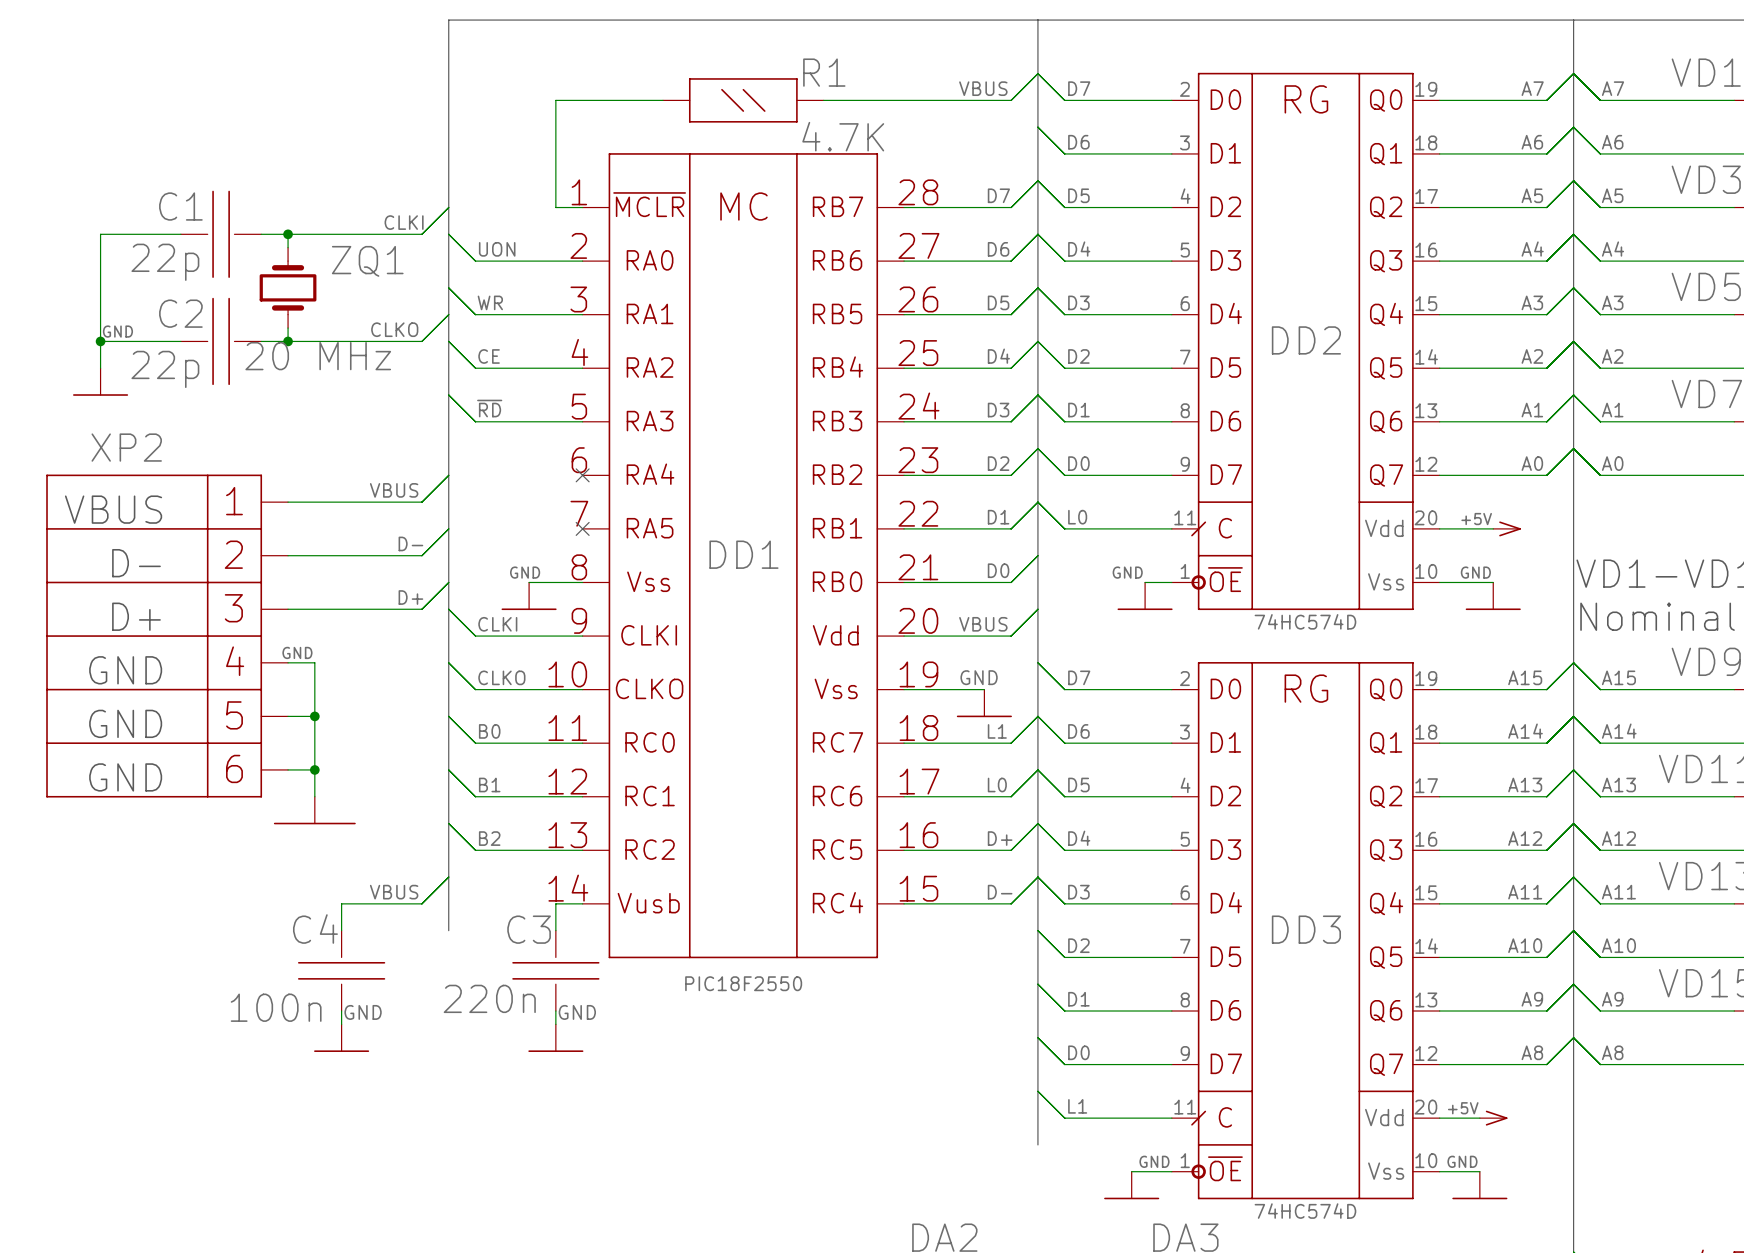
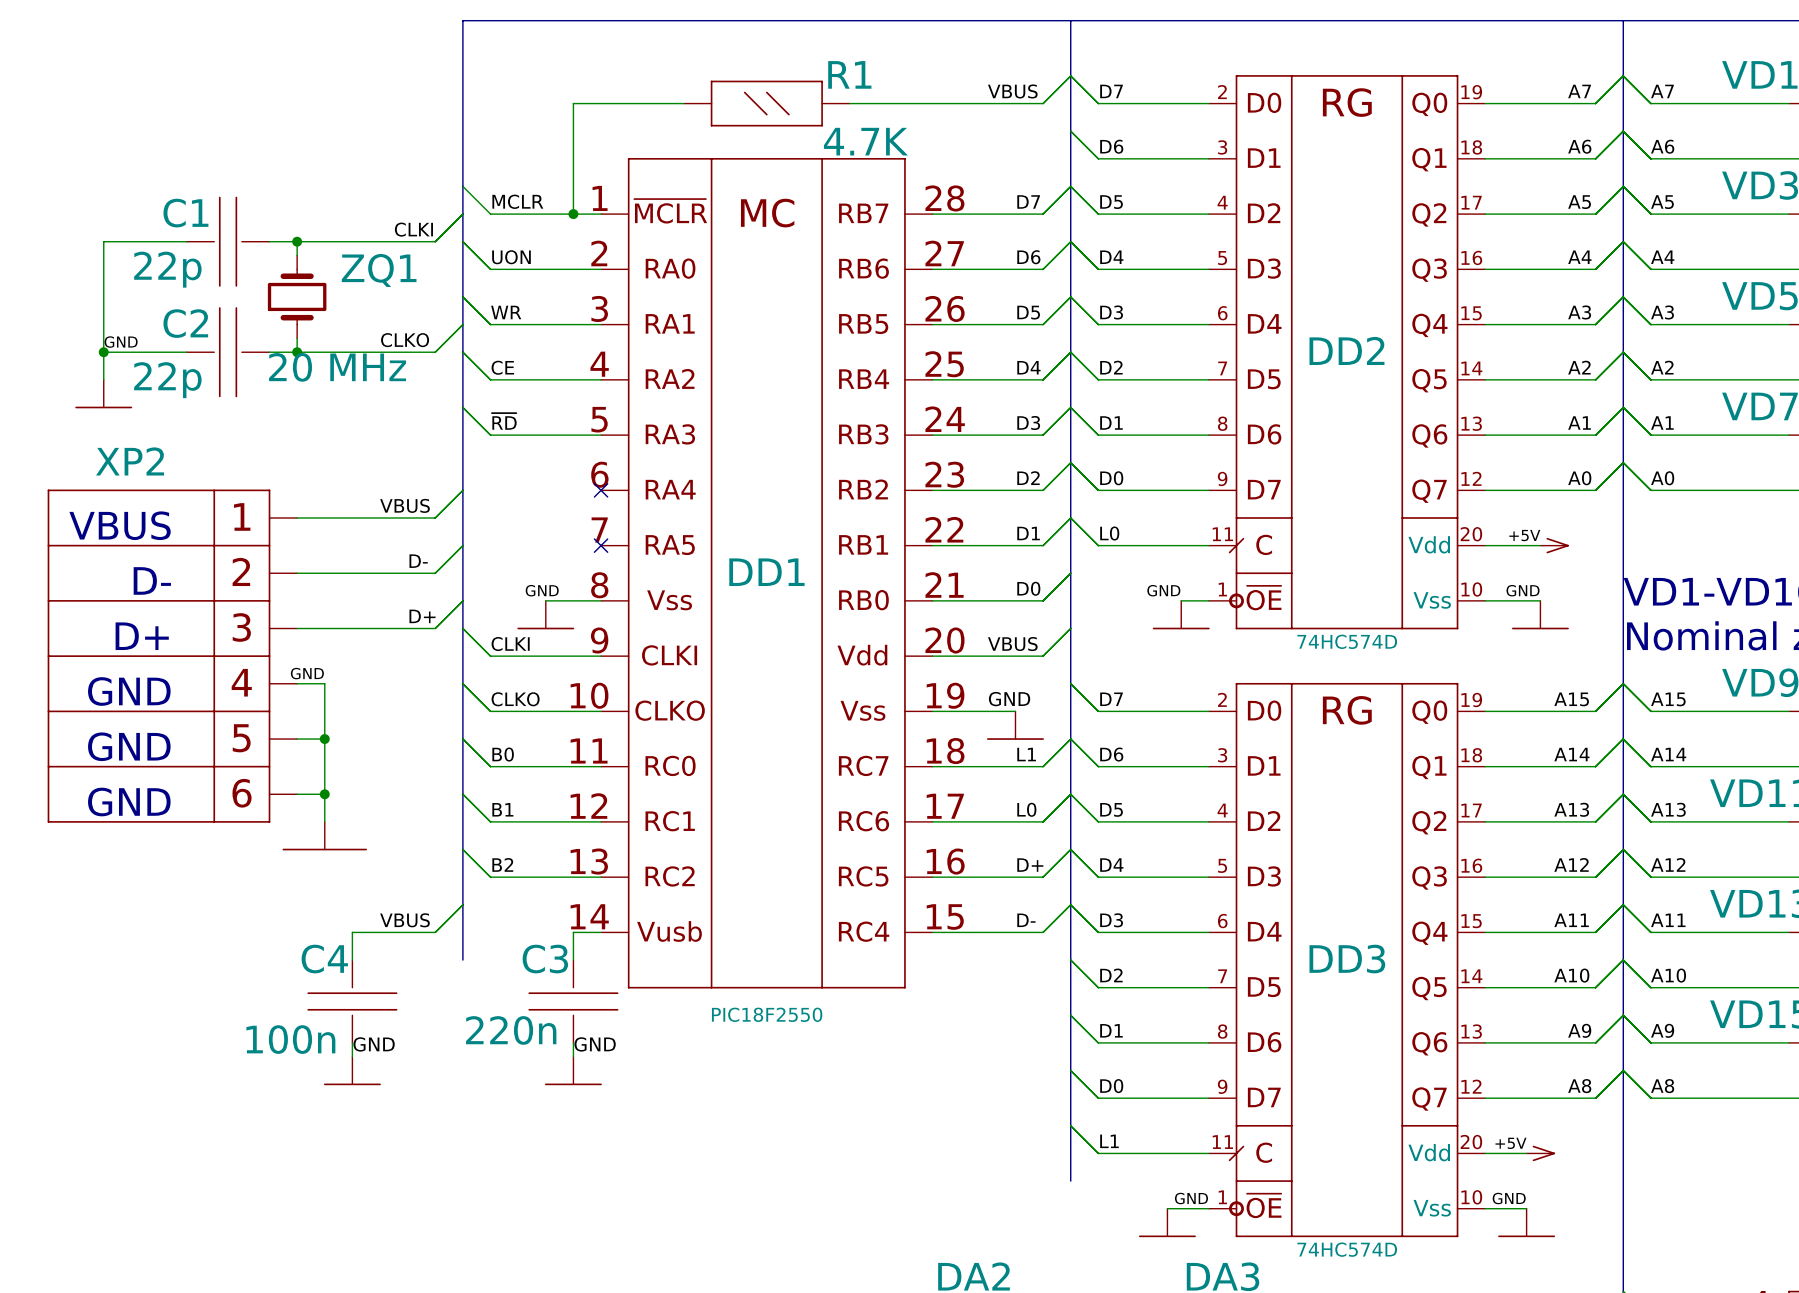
wire: none -> (462, 186) (490, 214) (573, 214)
label: none -> MCLR (517, 201)
junction: none -> (573, 214)

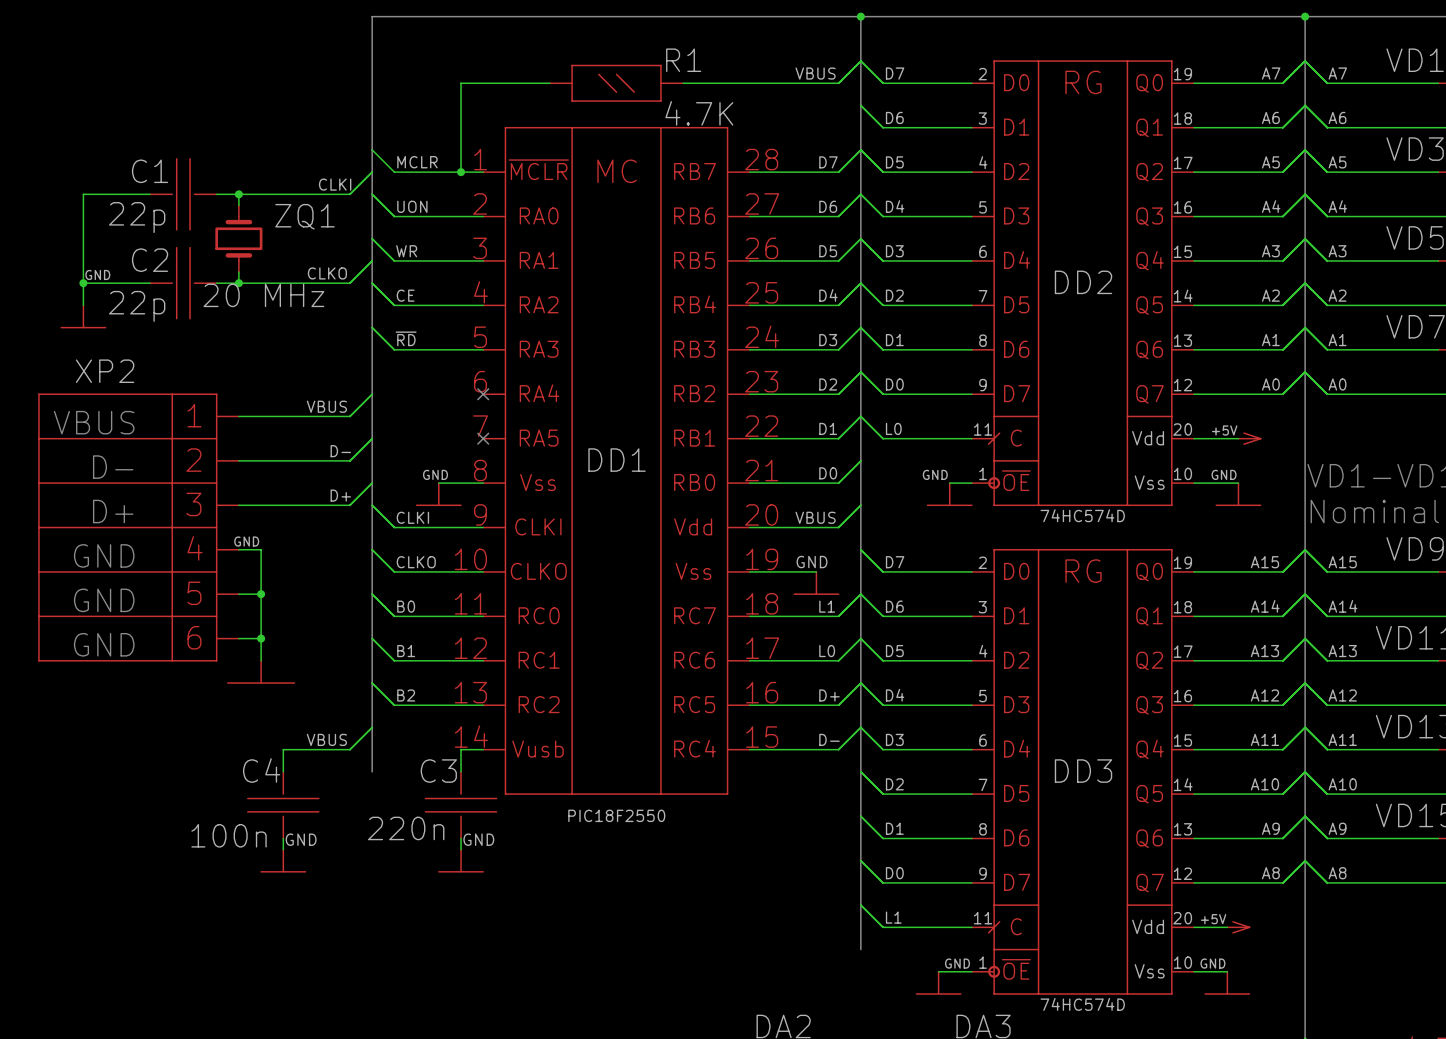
junction: none -> (860, 16)
junction: none -> (1305, 16)

